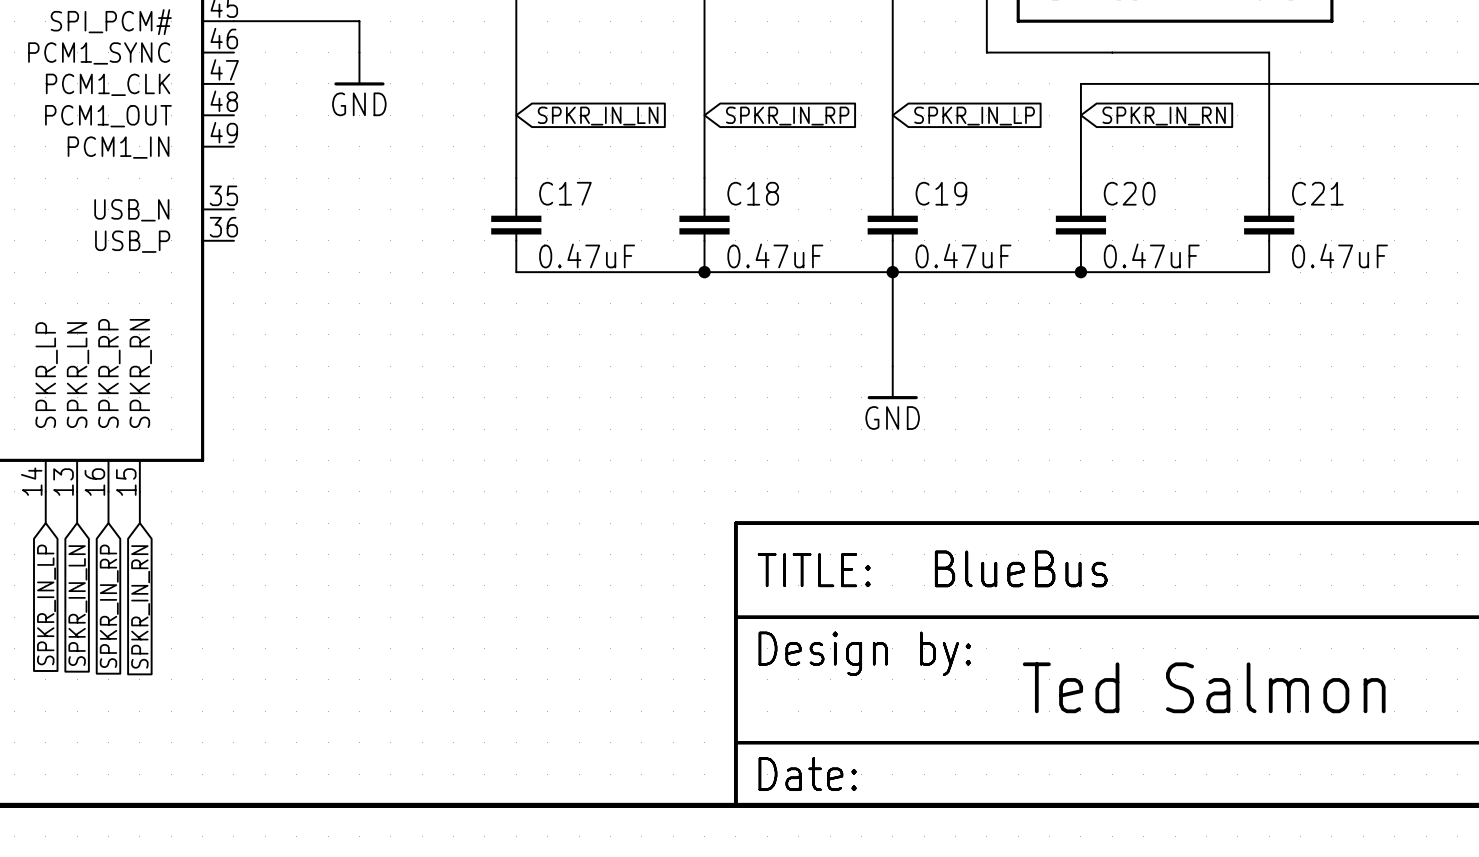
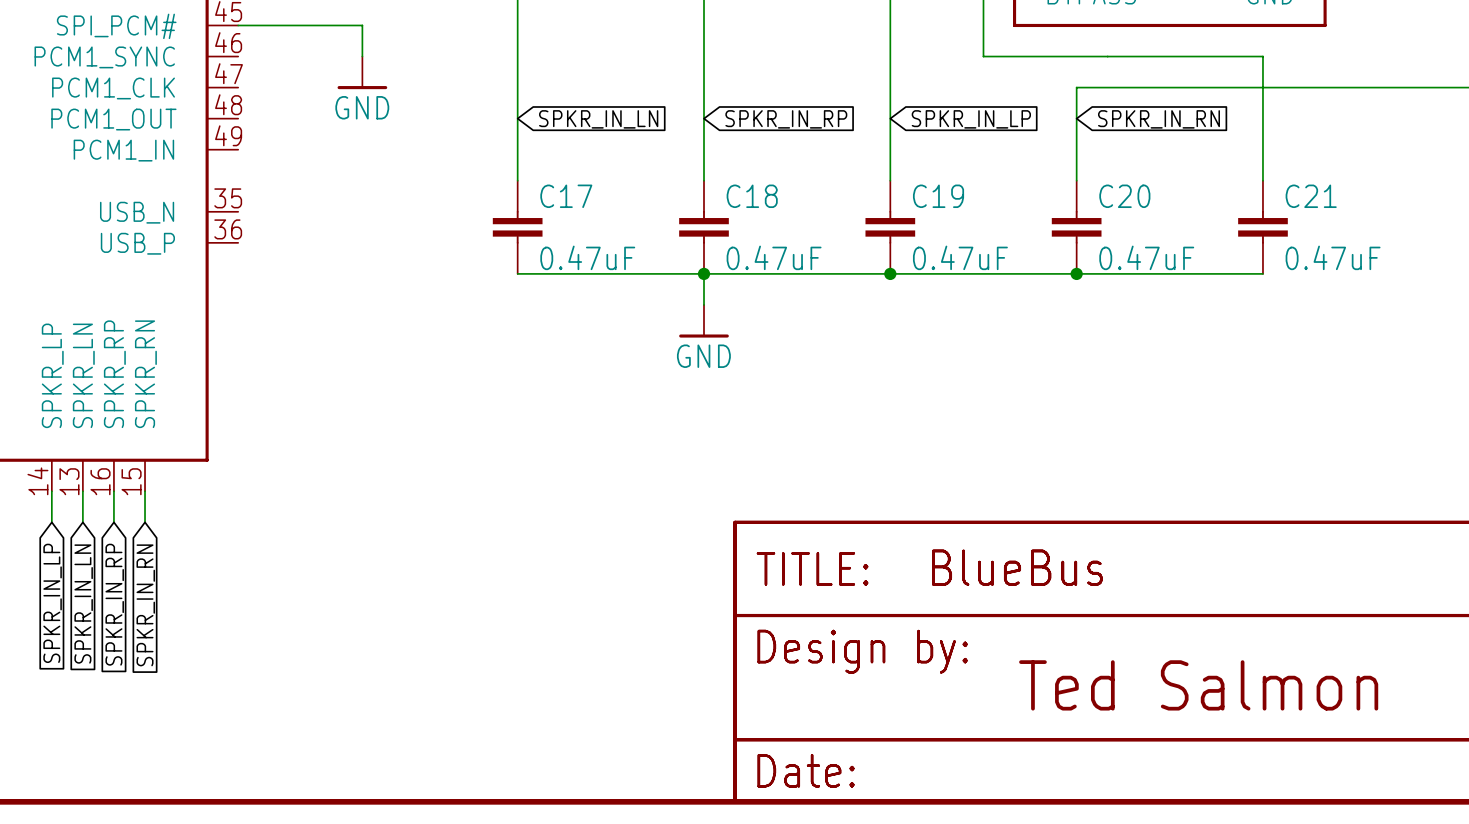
wire: none -> (703, 273) (703, 304)
wire: (892, 272) (892, 366) -> none
power symbol position: GND (892, 382) -> GND (703, 321)

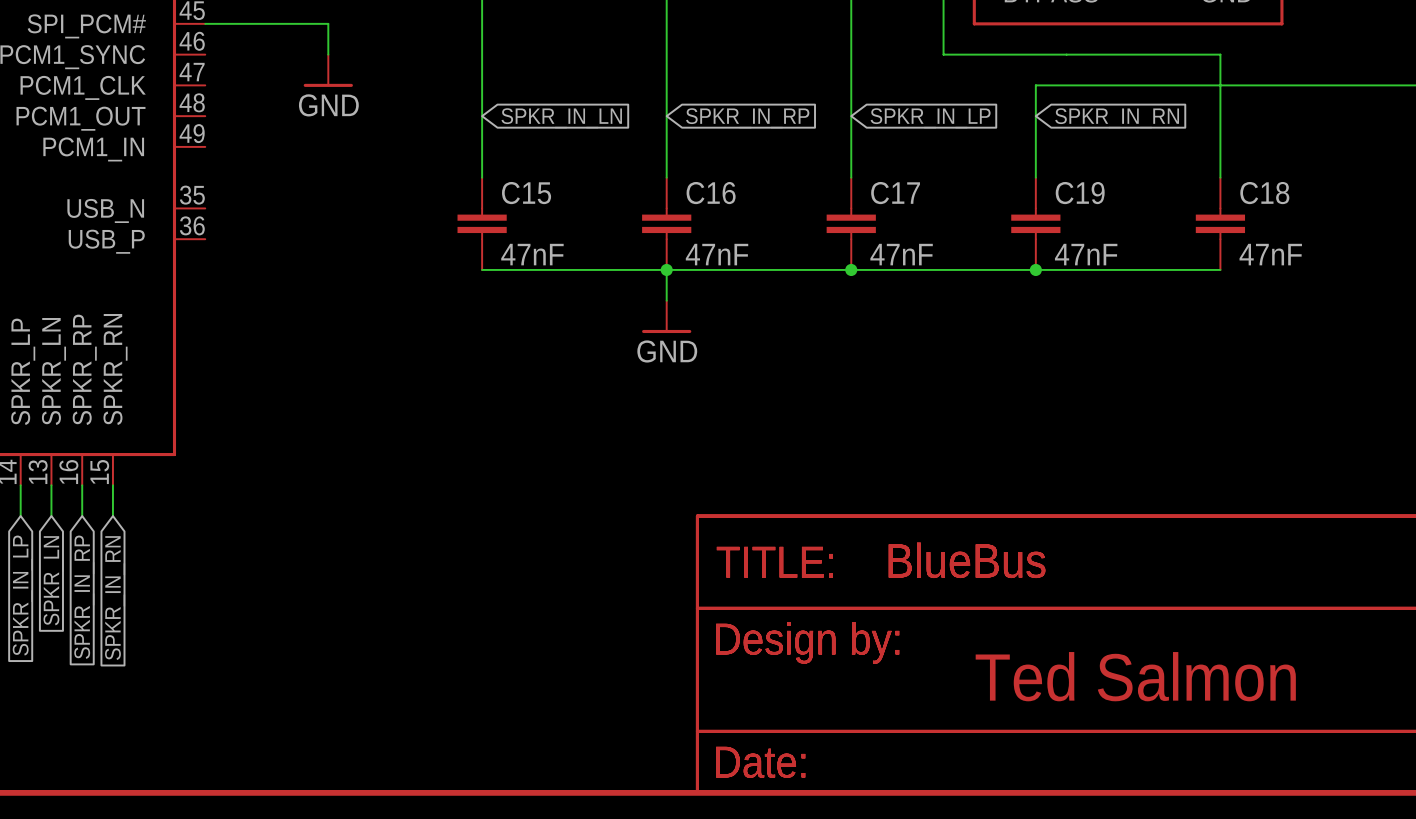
C17 name: C17 (566, 196) -> C15 (526, 193)
C18 name: C18 (752, 196) -> C16 (711, 193)
C19 name: C19 (938, 196) -> C17 (895, 193)
C20 name: C20 (1124, 196) -> C19 (1080, 193)
C21 name: C21 (1311, 196) -> C18 (1264, 193)
C17 value: 0.47uF (587, 257) -> 47nF (532, 254)
C18 value: 0.47uF (774, 257) -> 47nF (717, 254)
C19 value: 0.47uF (960, 257) -> 47nF (901, 254)
C20 value: 0.47uF (1146, 257) -> 47nF (1086, 254)
C21 value: 0.47uF (1333, 257) -> 47nF (1270, 254)
global label: SPKR_IN_LN (83, 604) -> SPKR_LN (53, 580)

